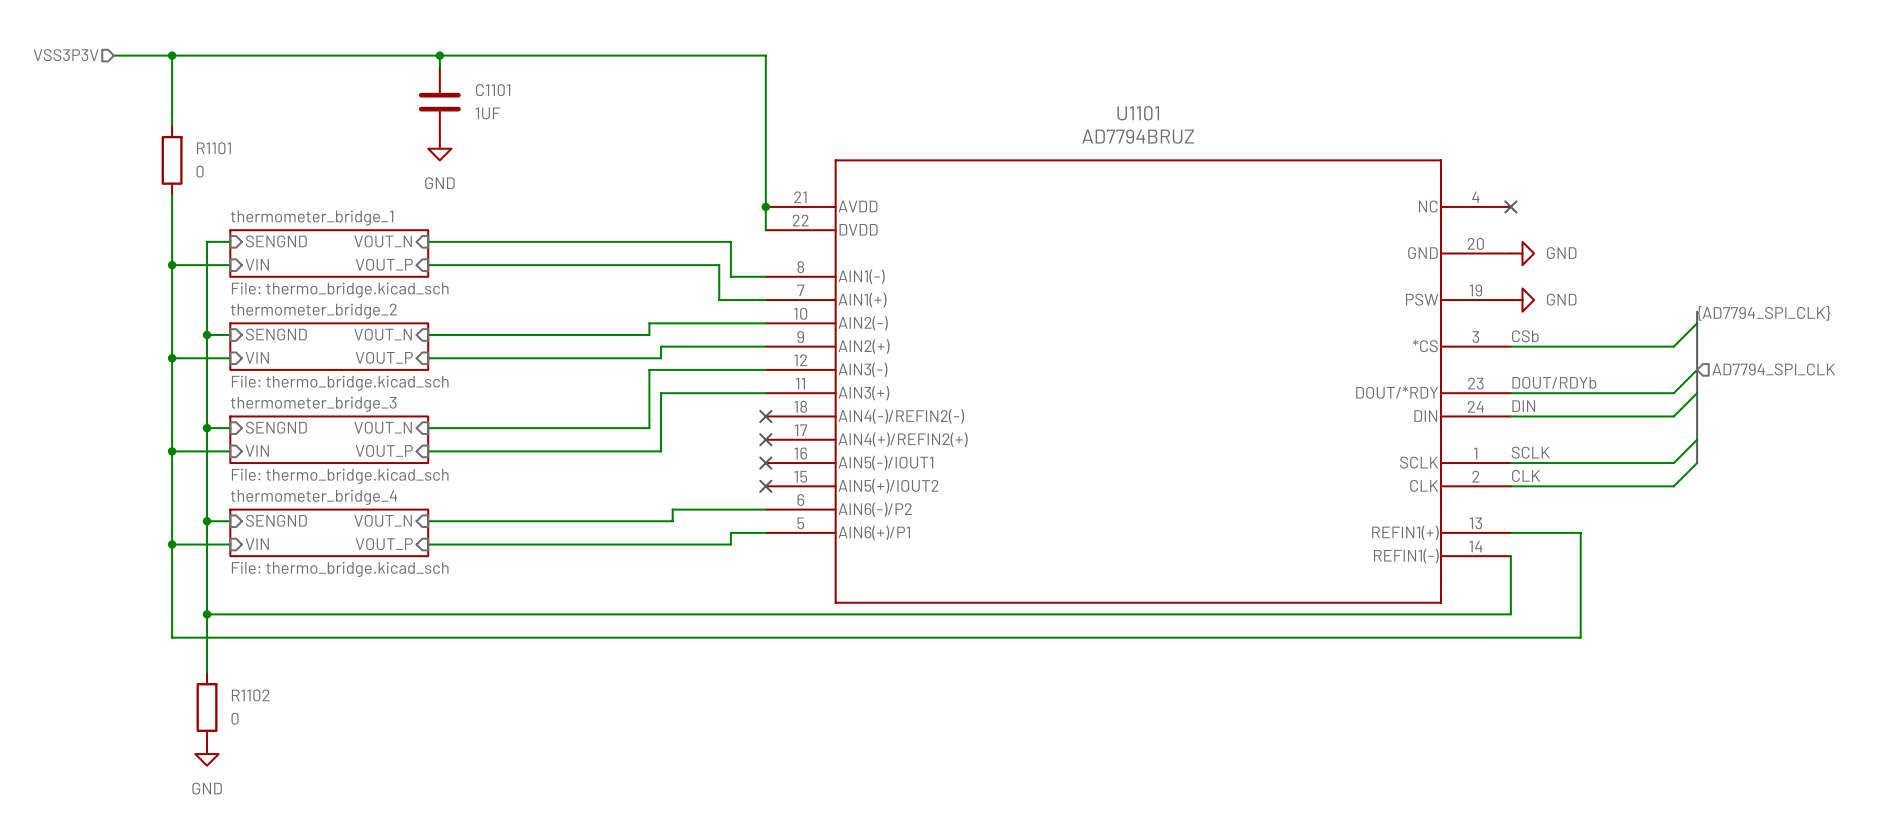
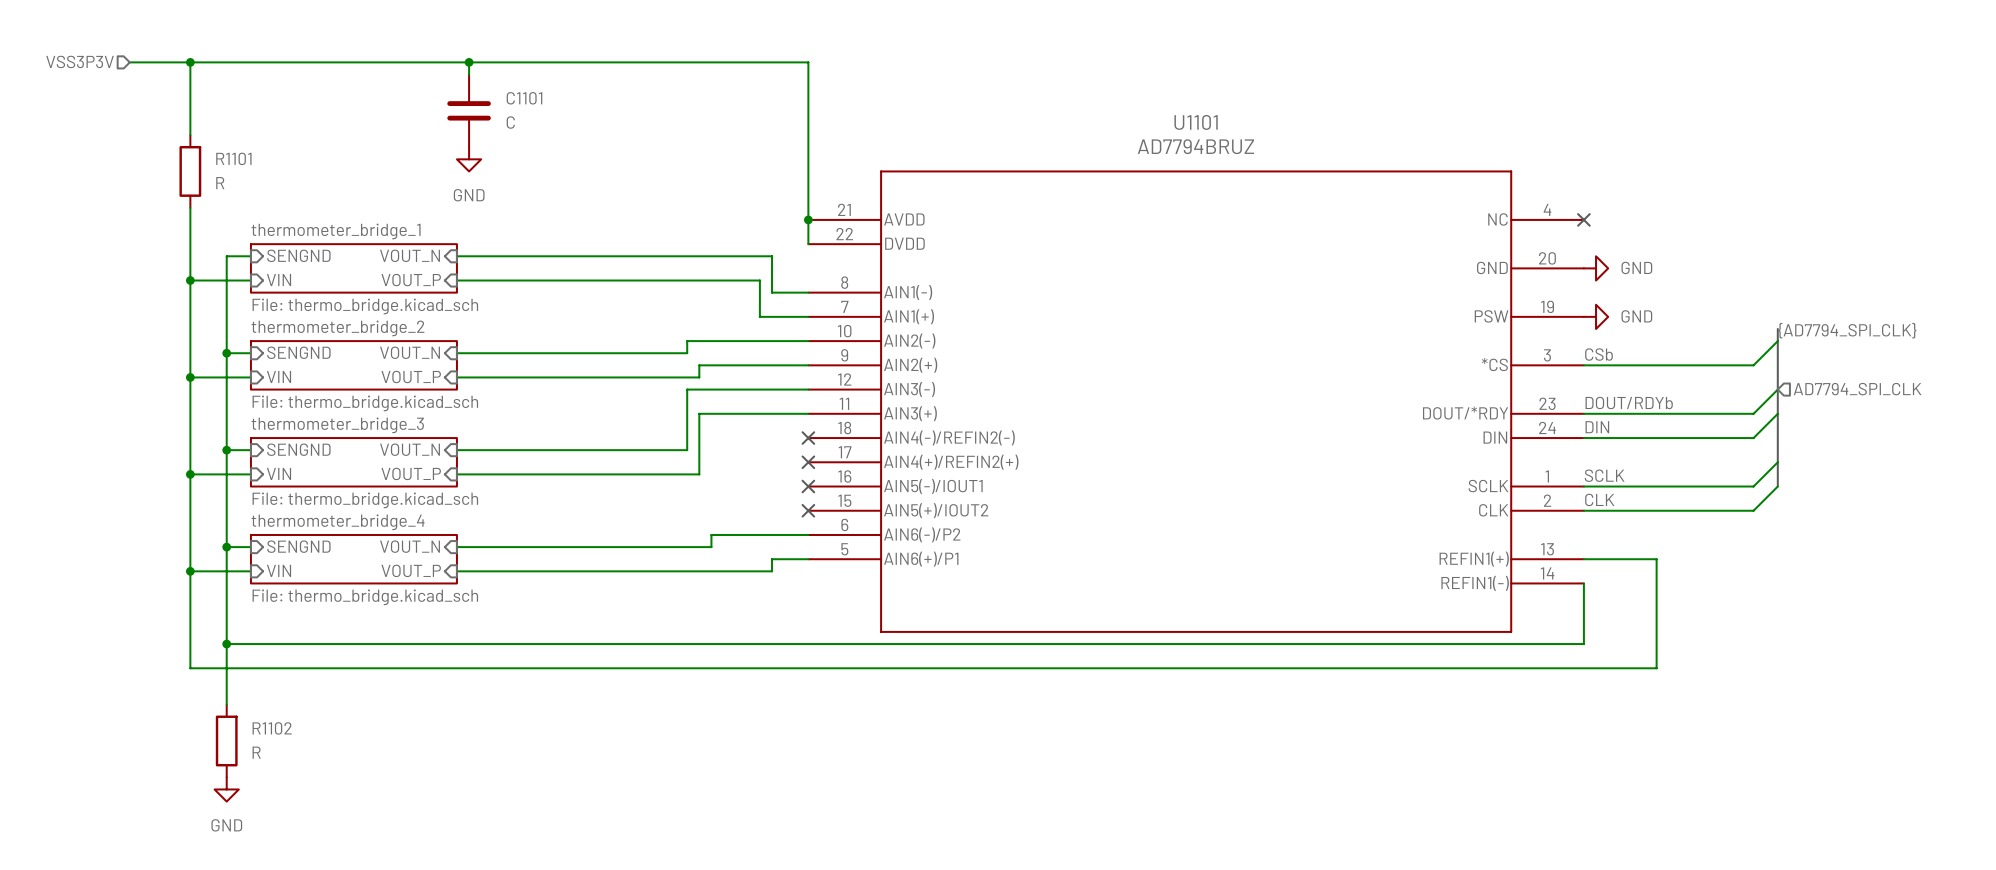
C1101 value: 1UF (488, 113) -> C (510, 122)
R1101 value: 0 (200, 171) -> R (220, 183)
R1102 value: 0 (235, 718) -> R (256, 752)

